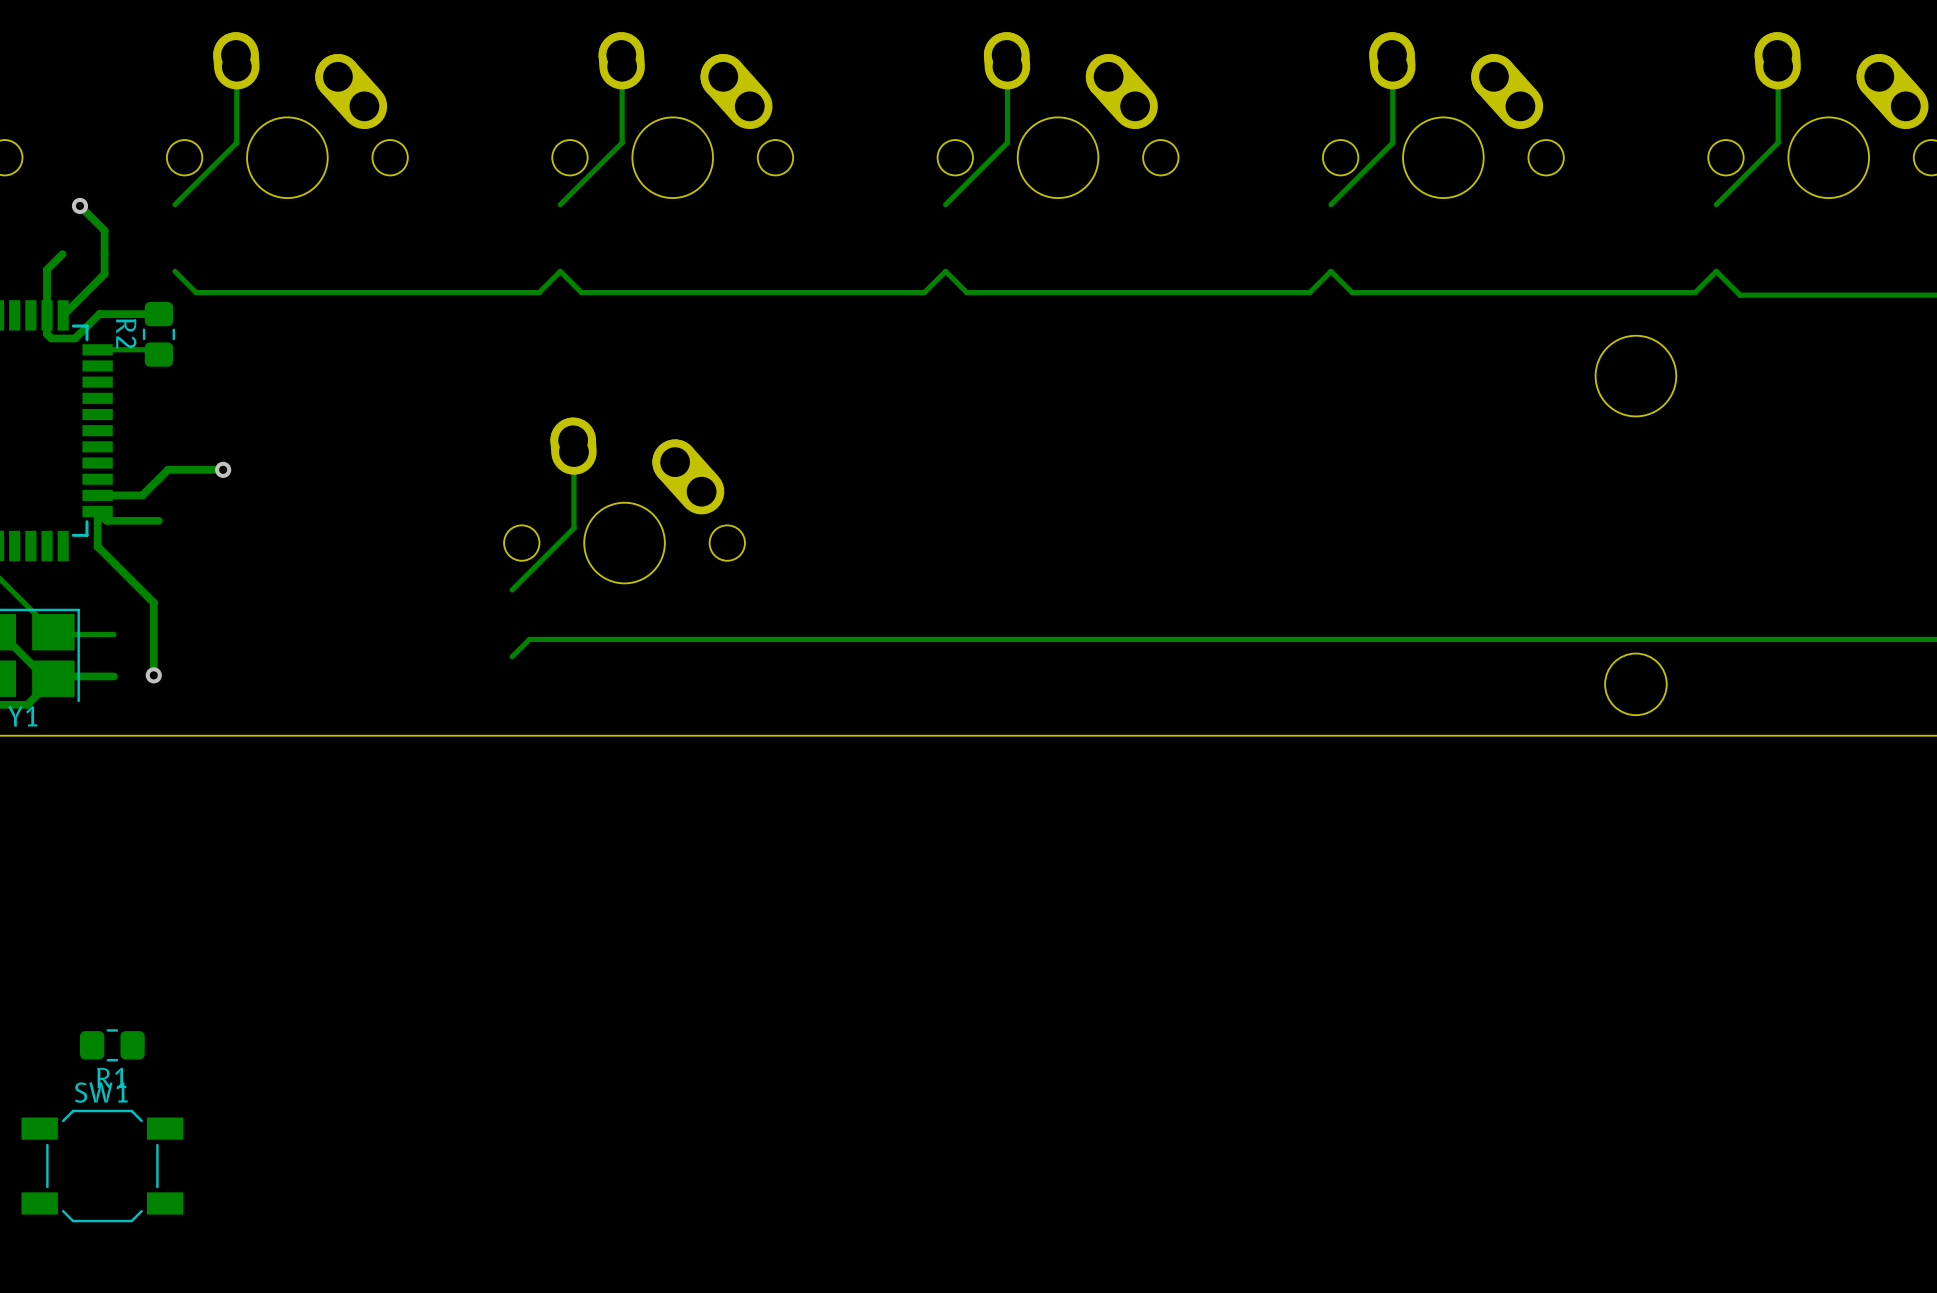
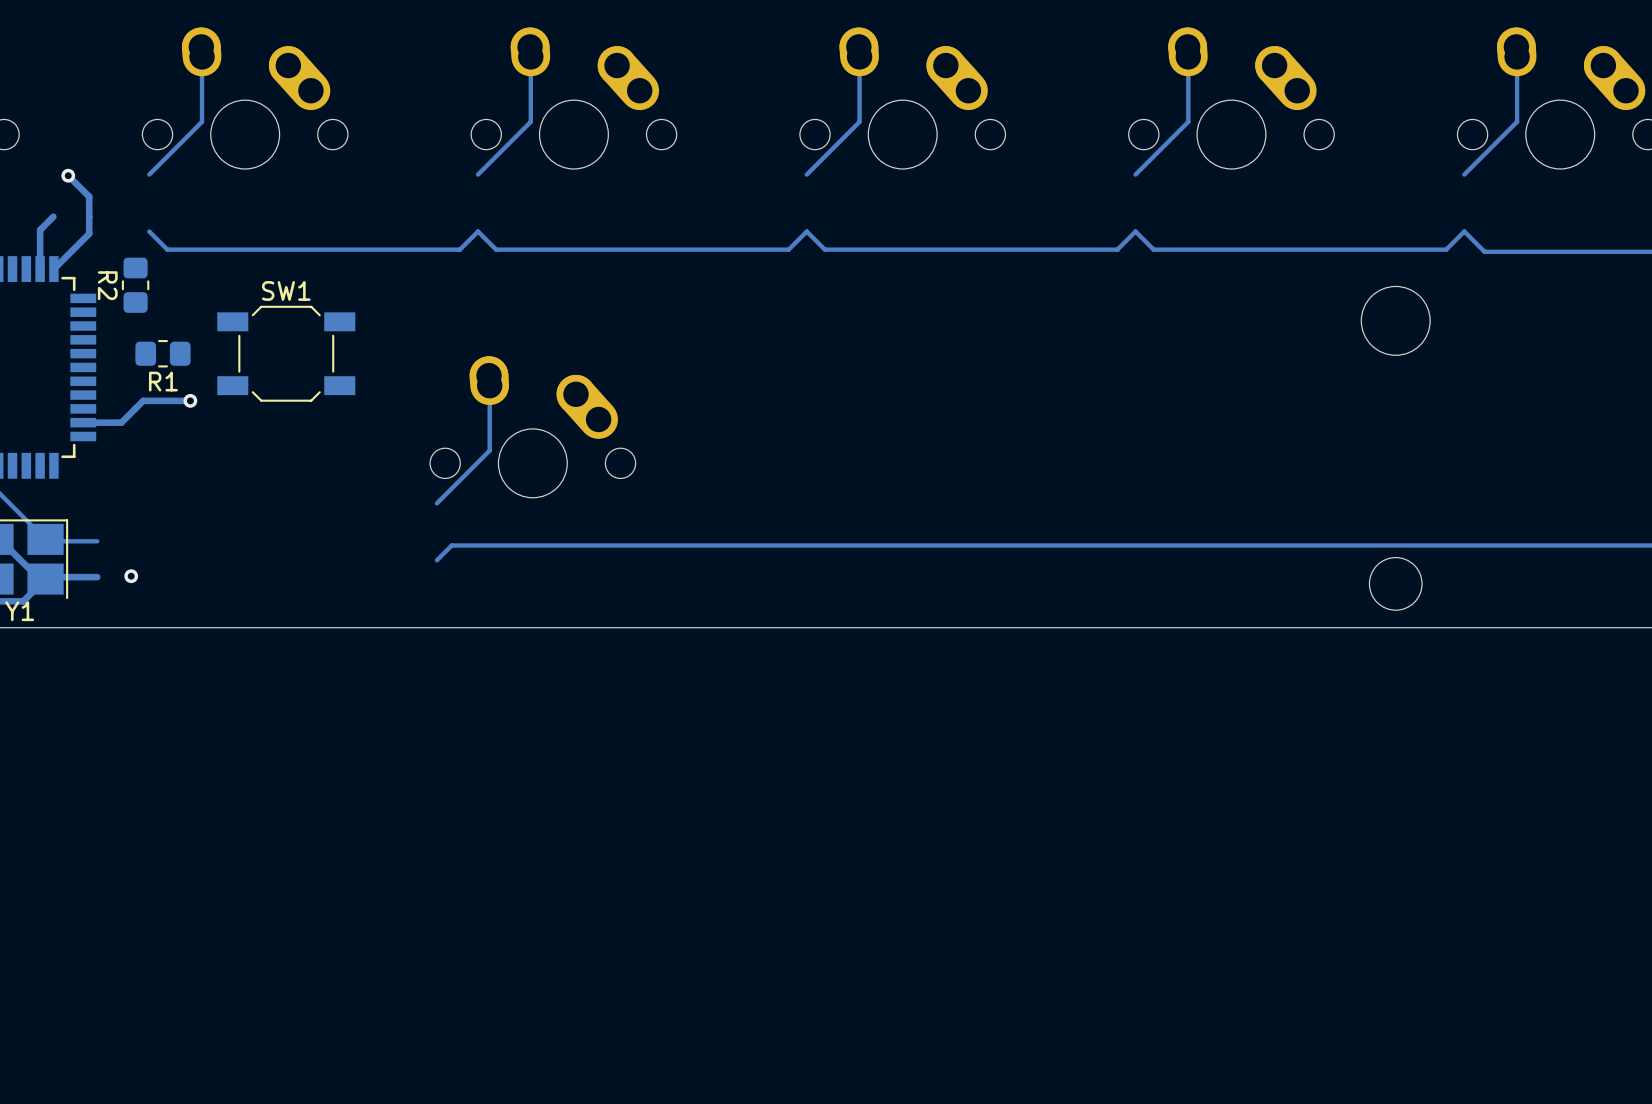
track: (158, 314) (99, 314) (75, 338) (51, 338) (47, 334) (47, 315) -> none
track: (97, 349) (151, 349) (158, 354) -> none
track: (158, 520) (106, 520) (97, 511) (97, 546) (153, 602) (153, 675) -> none
R1 position: (112, 1045) -> (162, 353)
SW1 position: (102, 1166) -> (286, 353)

